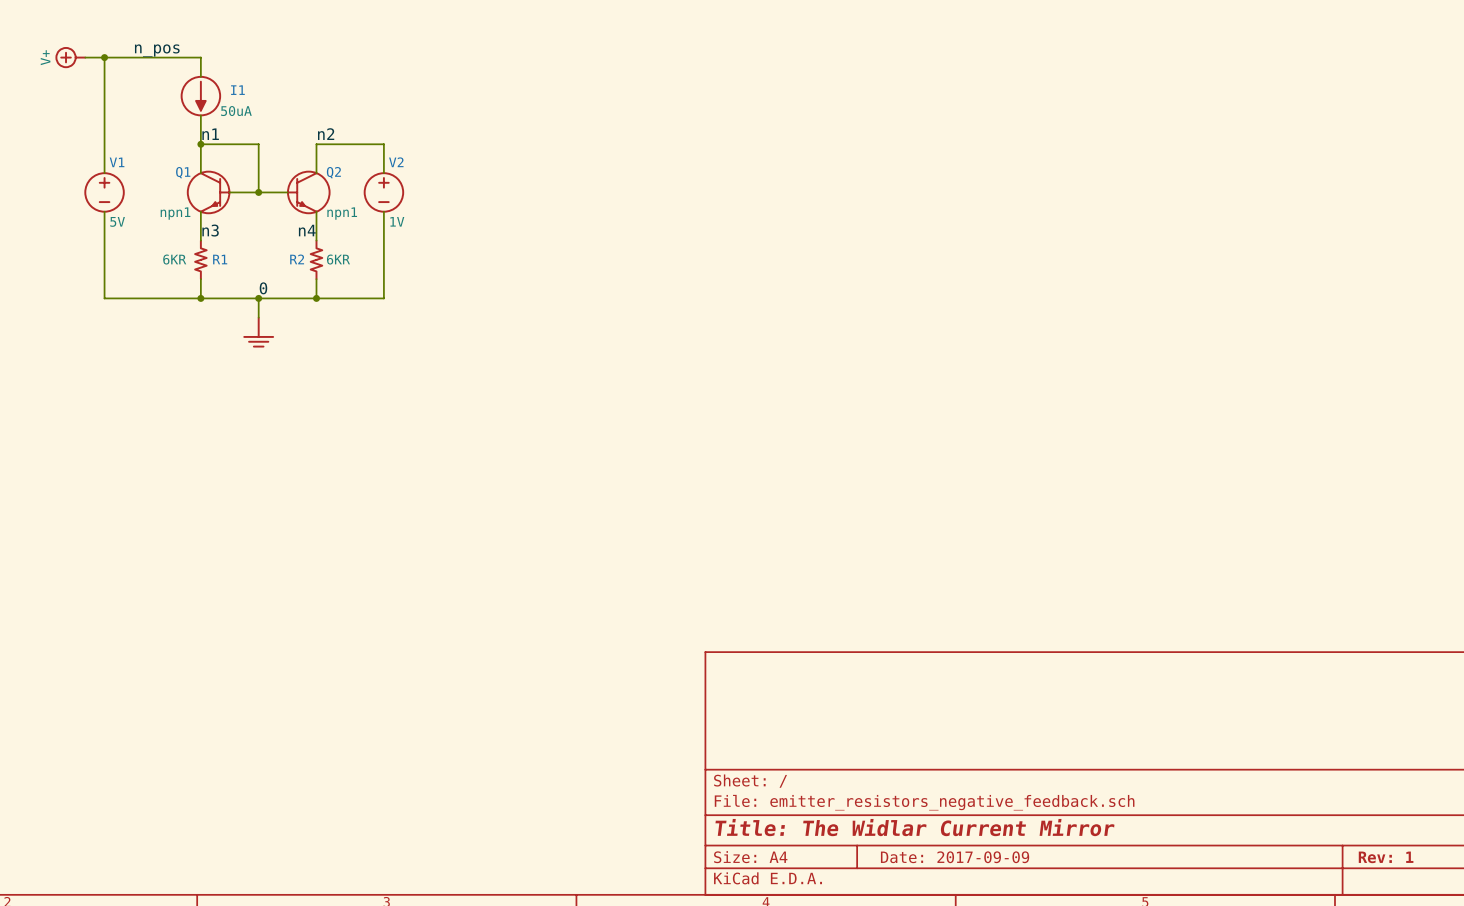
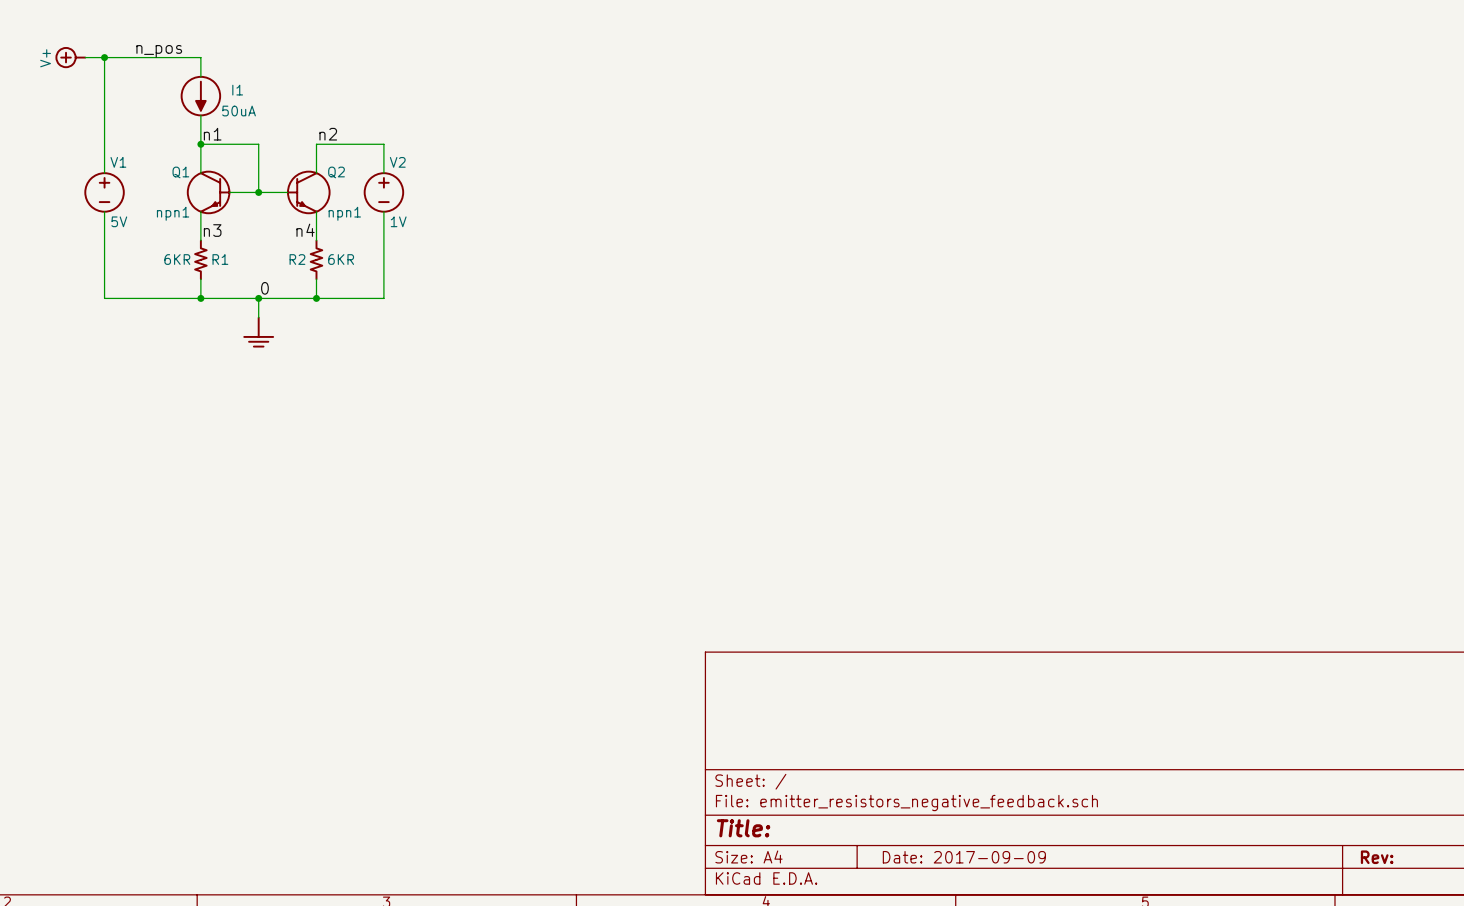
title block: Title: The Widlar Current Mirror (914, 827) -> Title: (743, 828)
title block: Rev: 1 (1386, 857) -> Rev: (1377, 857)

